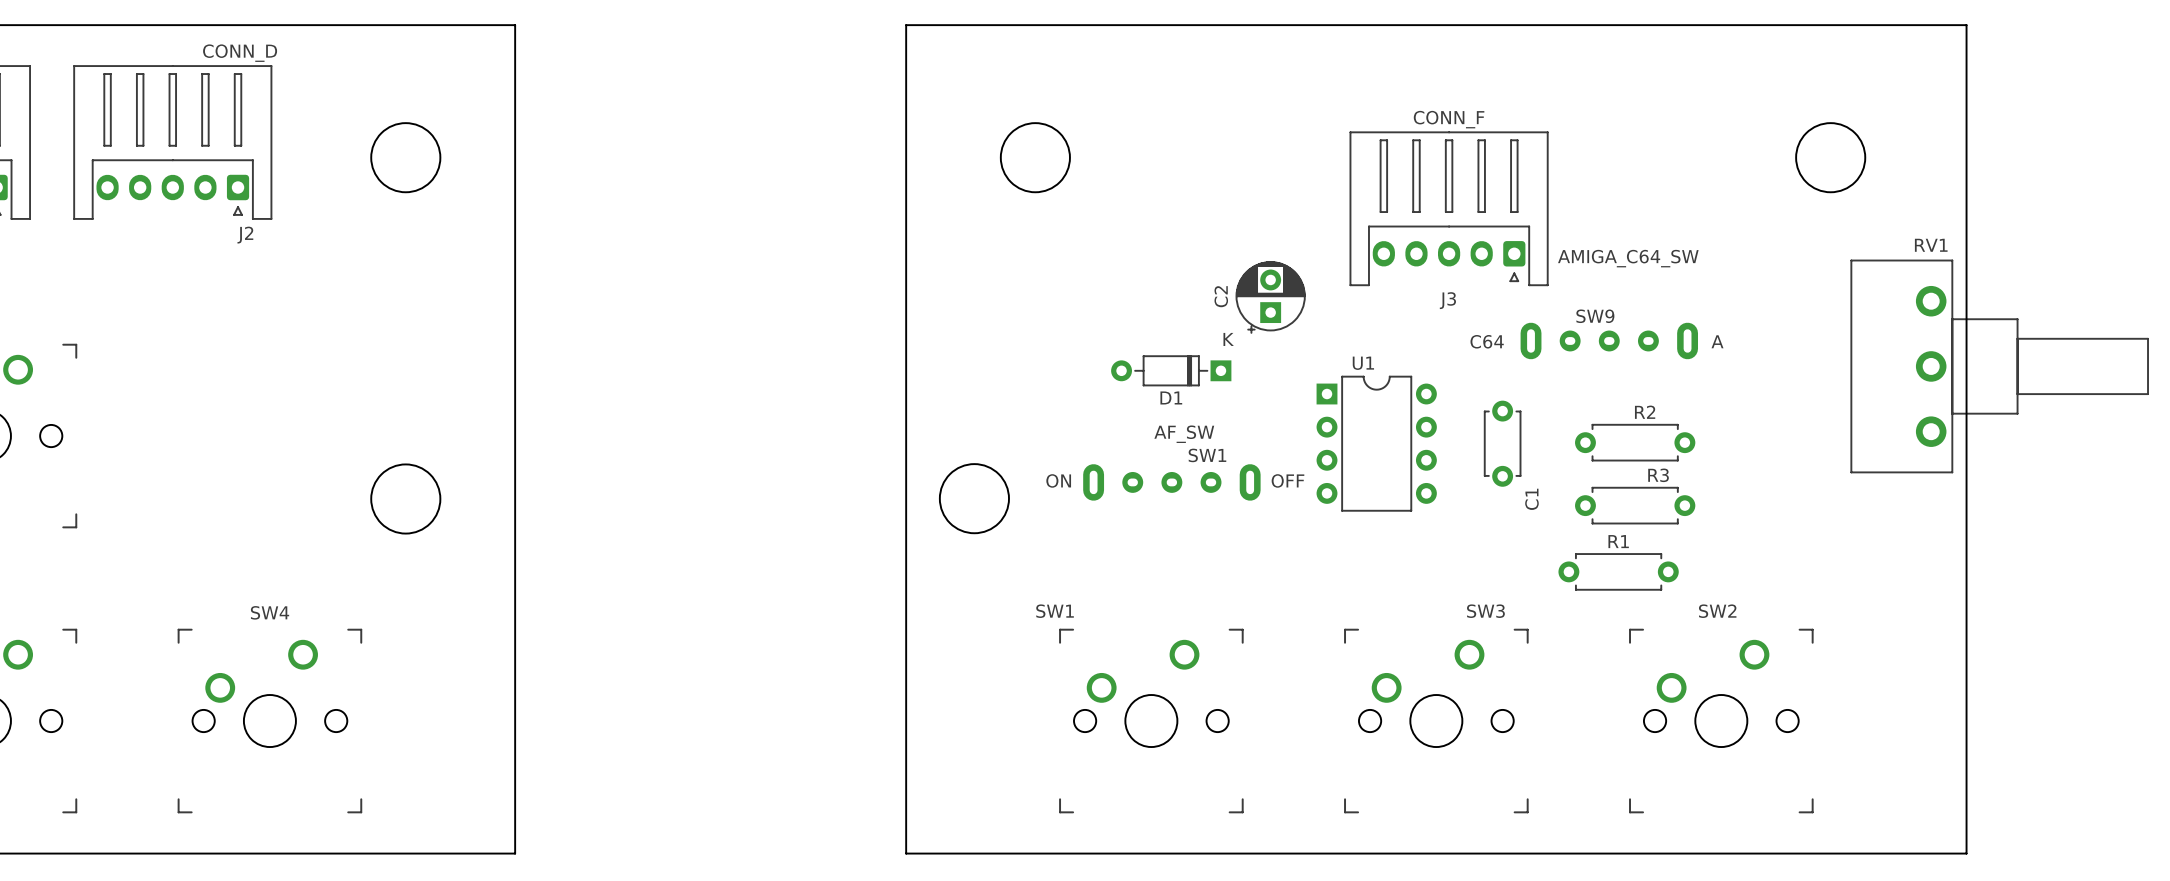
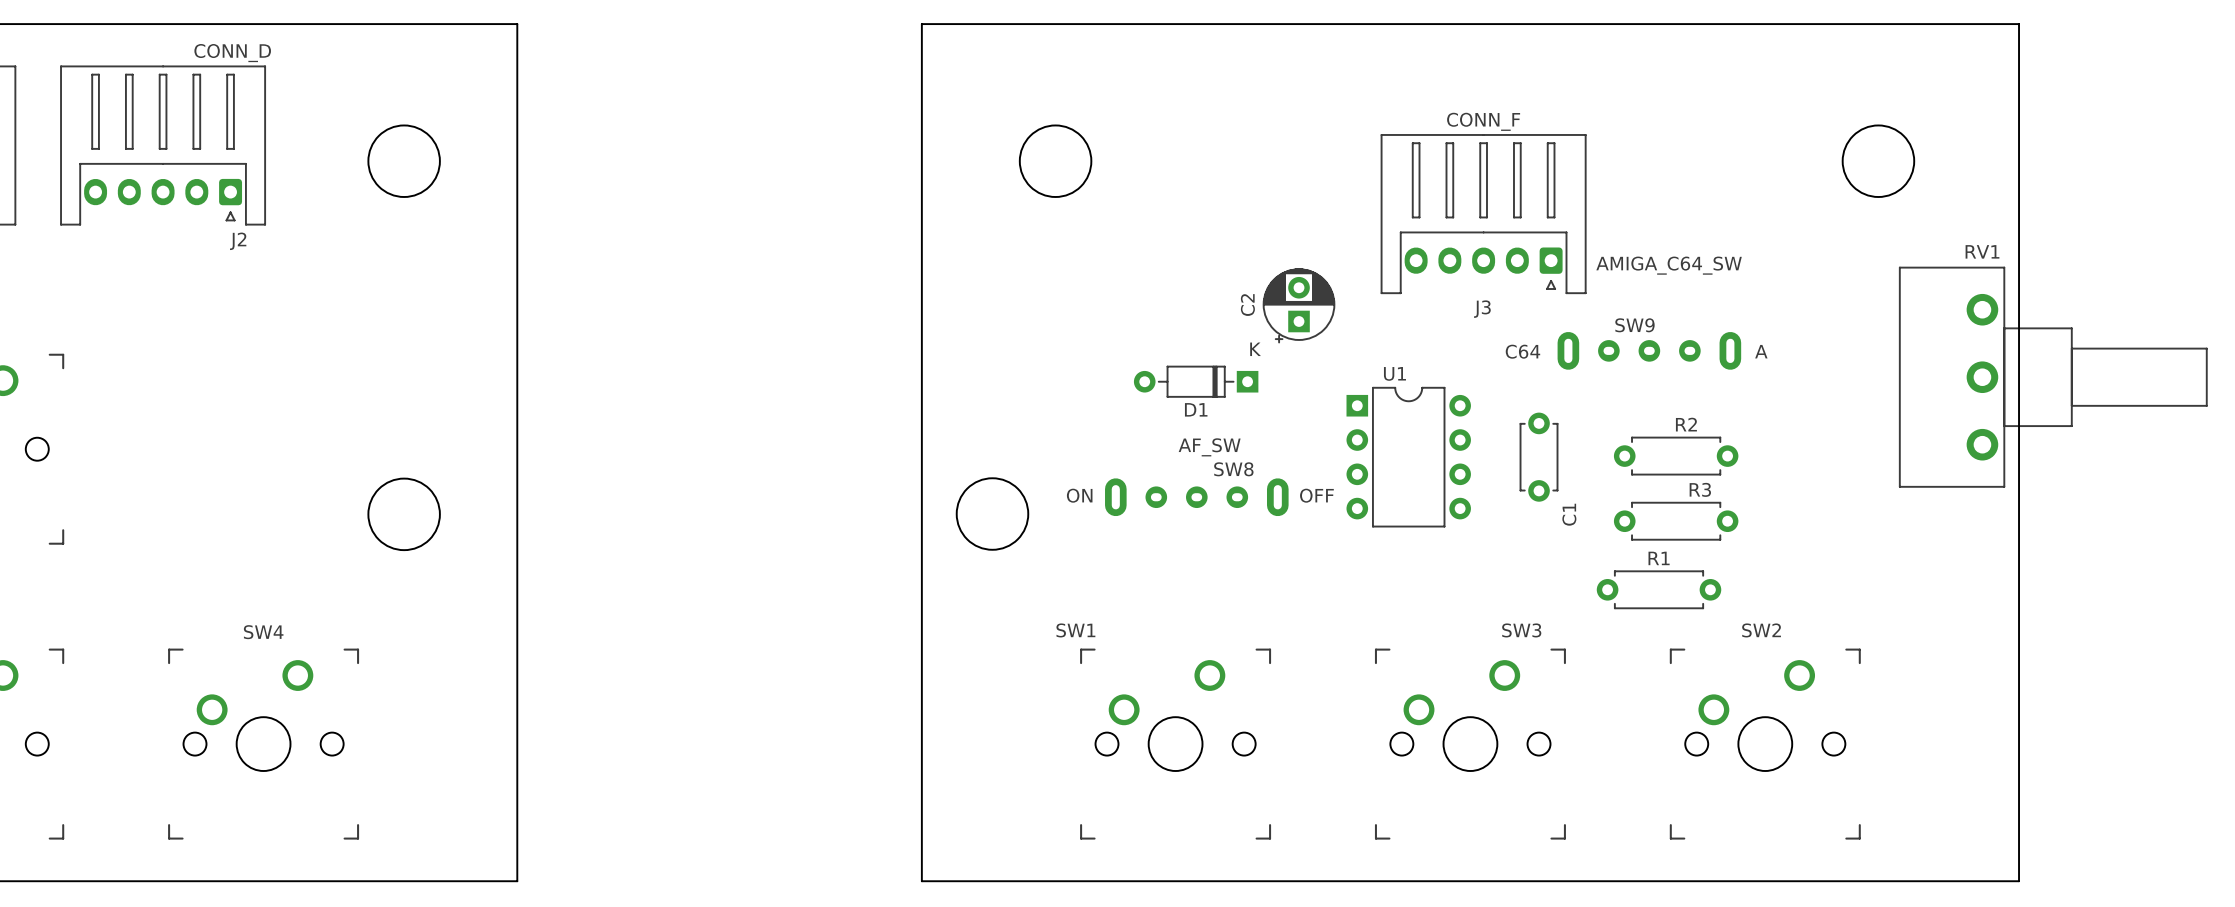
SW1 name: SW1 (1207, 455) -> SW8 (1233, 469)

